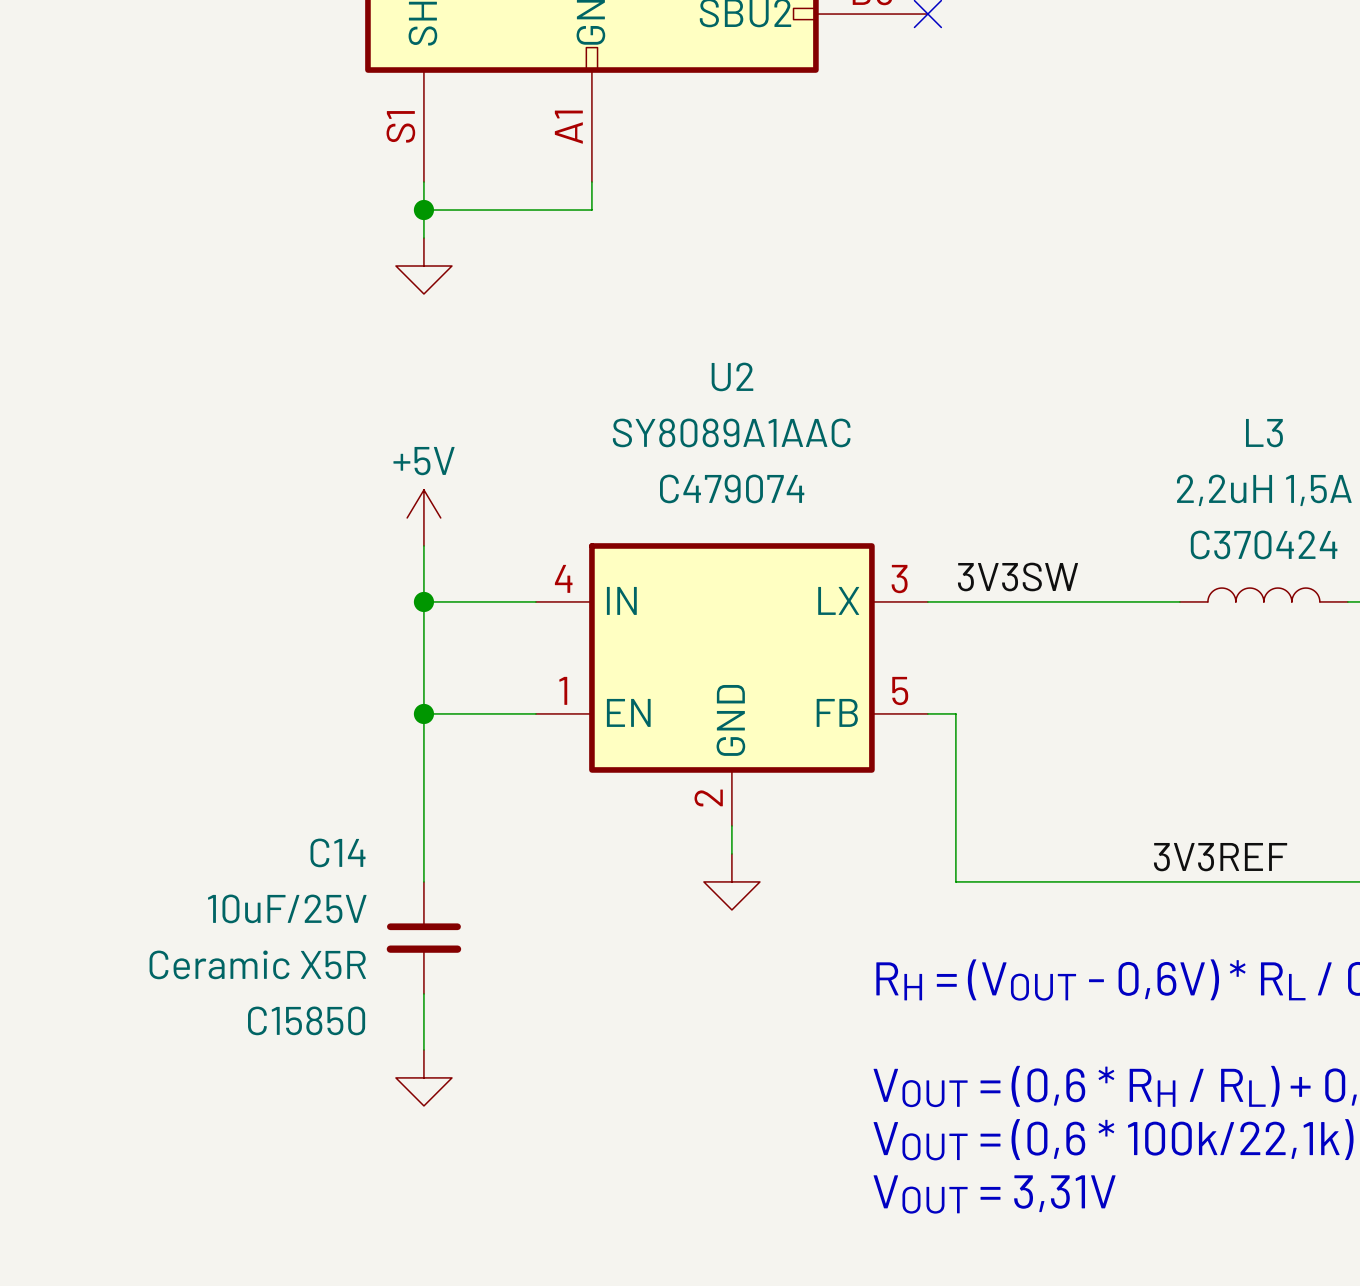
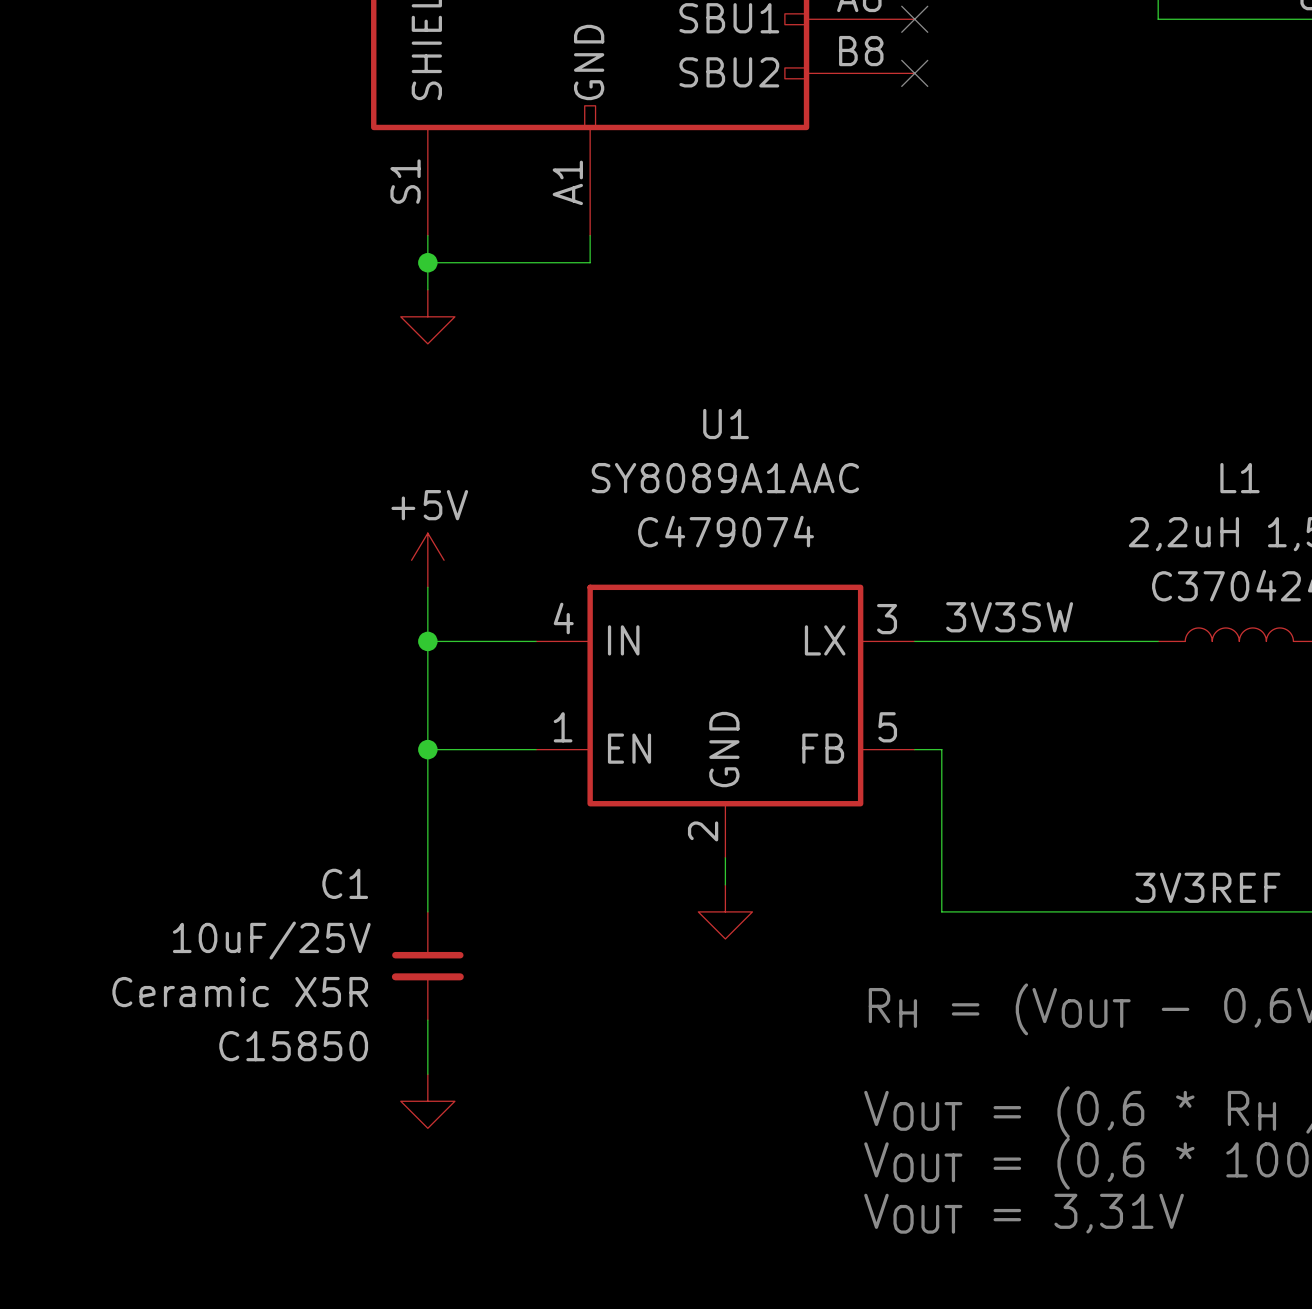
U2 name: U2 (732, 376) -> U1 (726, 424)
L3 name: L3 (1264, 433) -> L1 (1239, 478)
C14 name: C14 (338, 852) -> C1 (345, 883)

